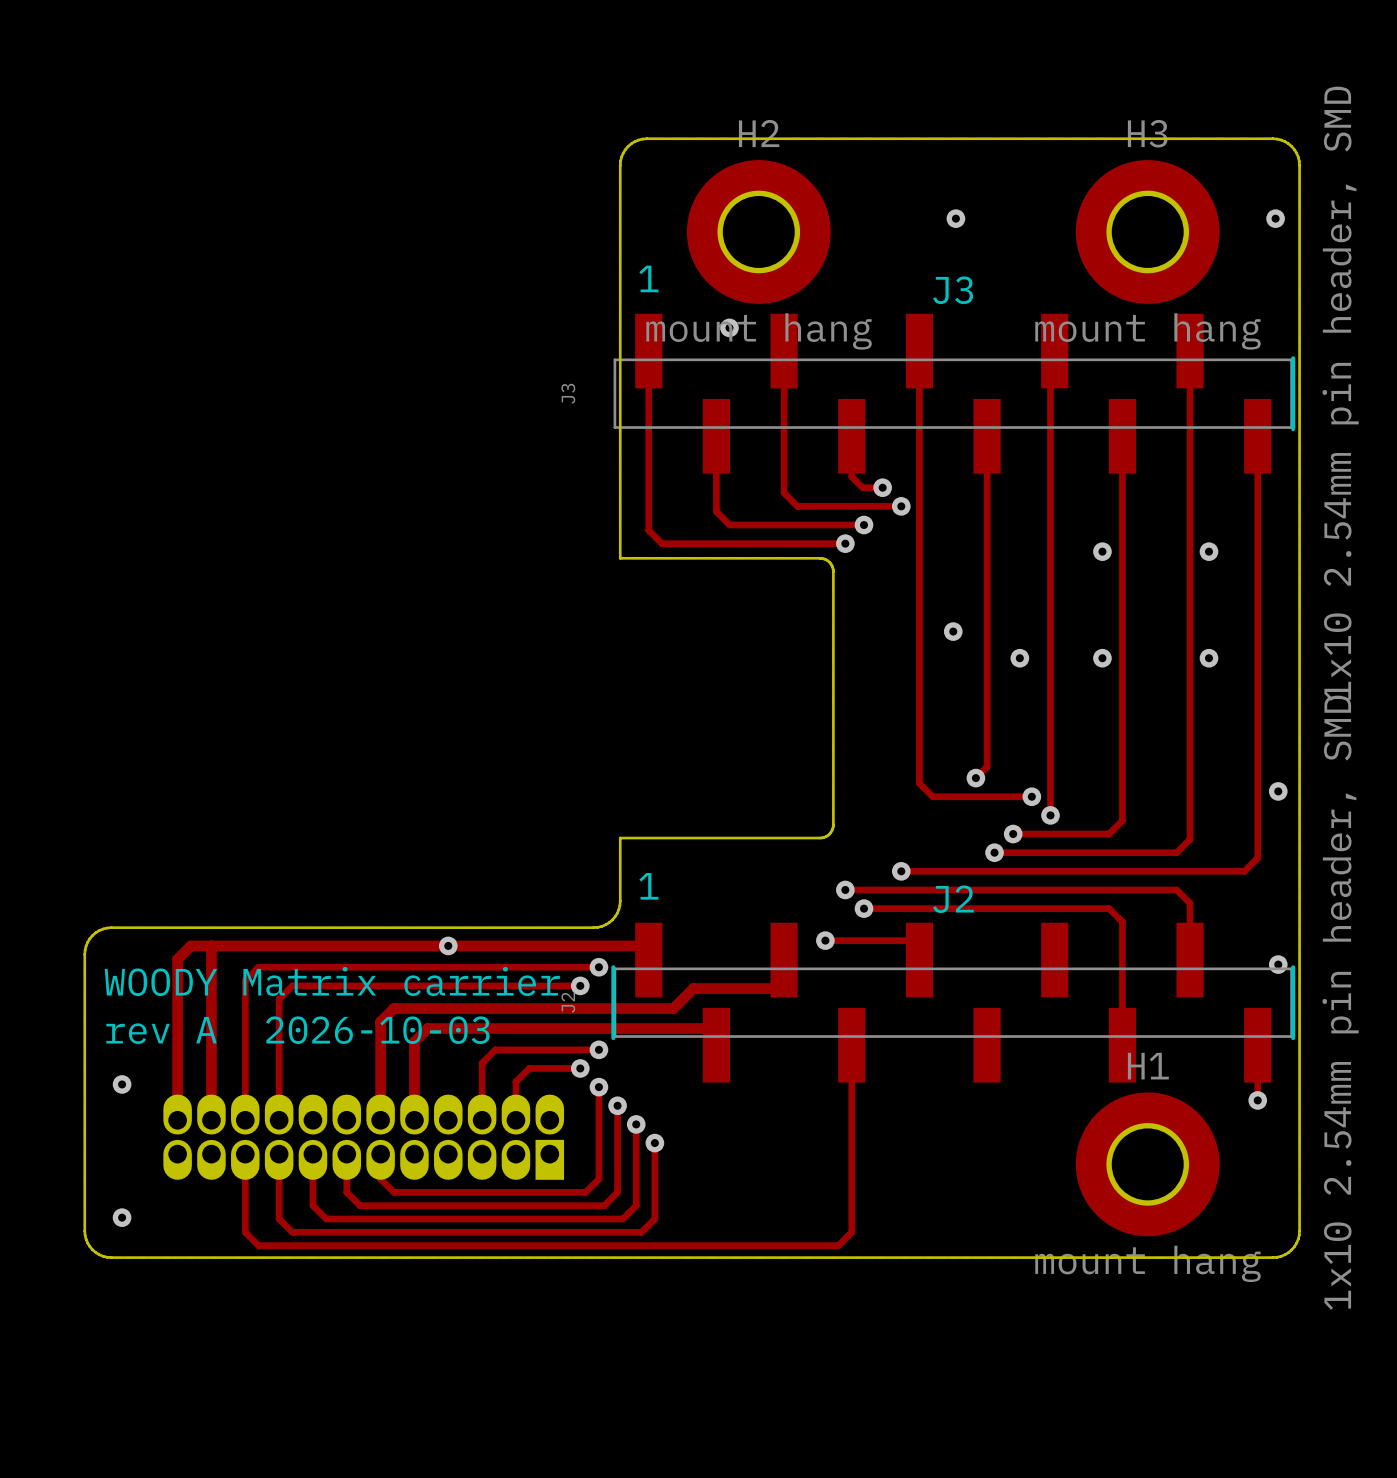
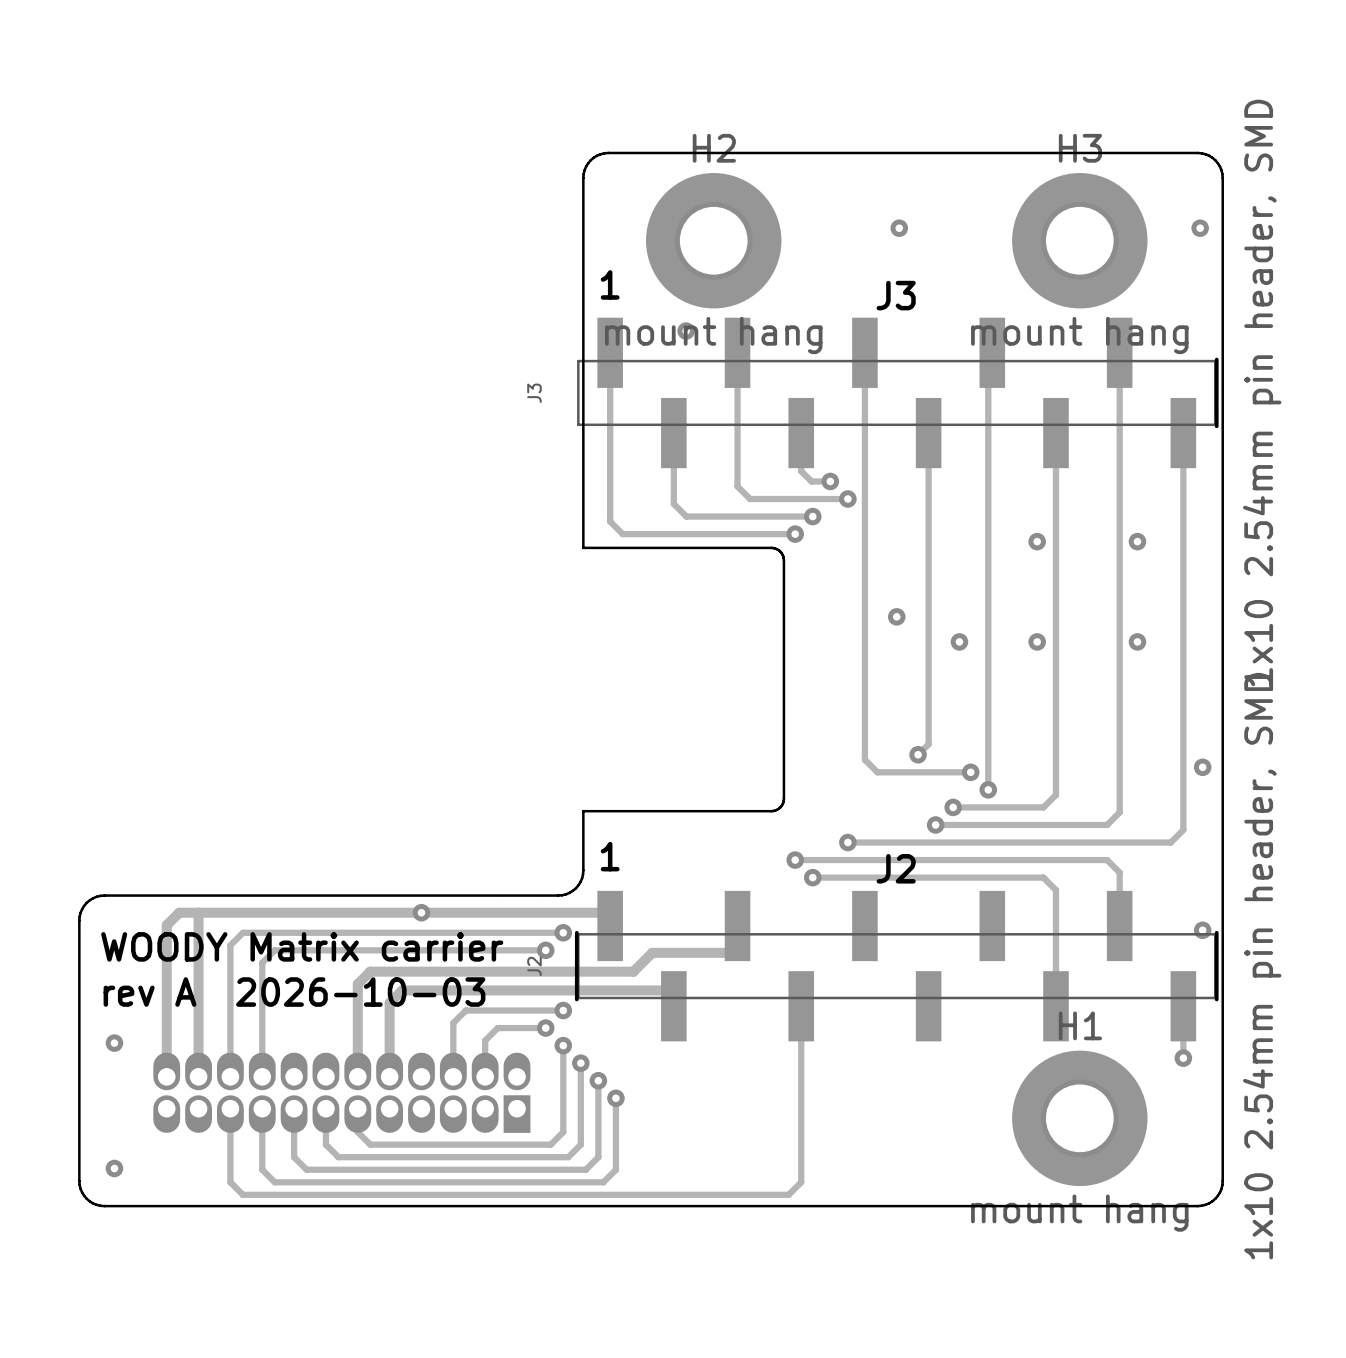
track: (825, 940) (919, 940) -> none
via: (825, 940) -> none

